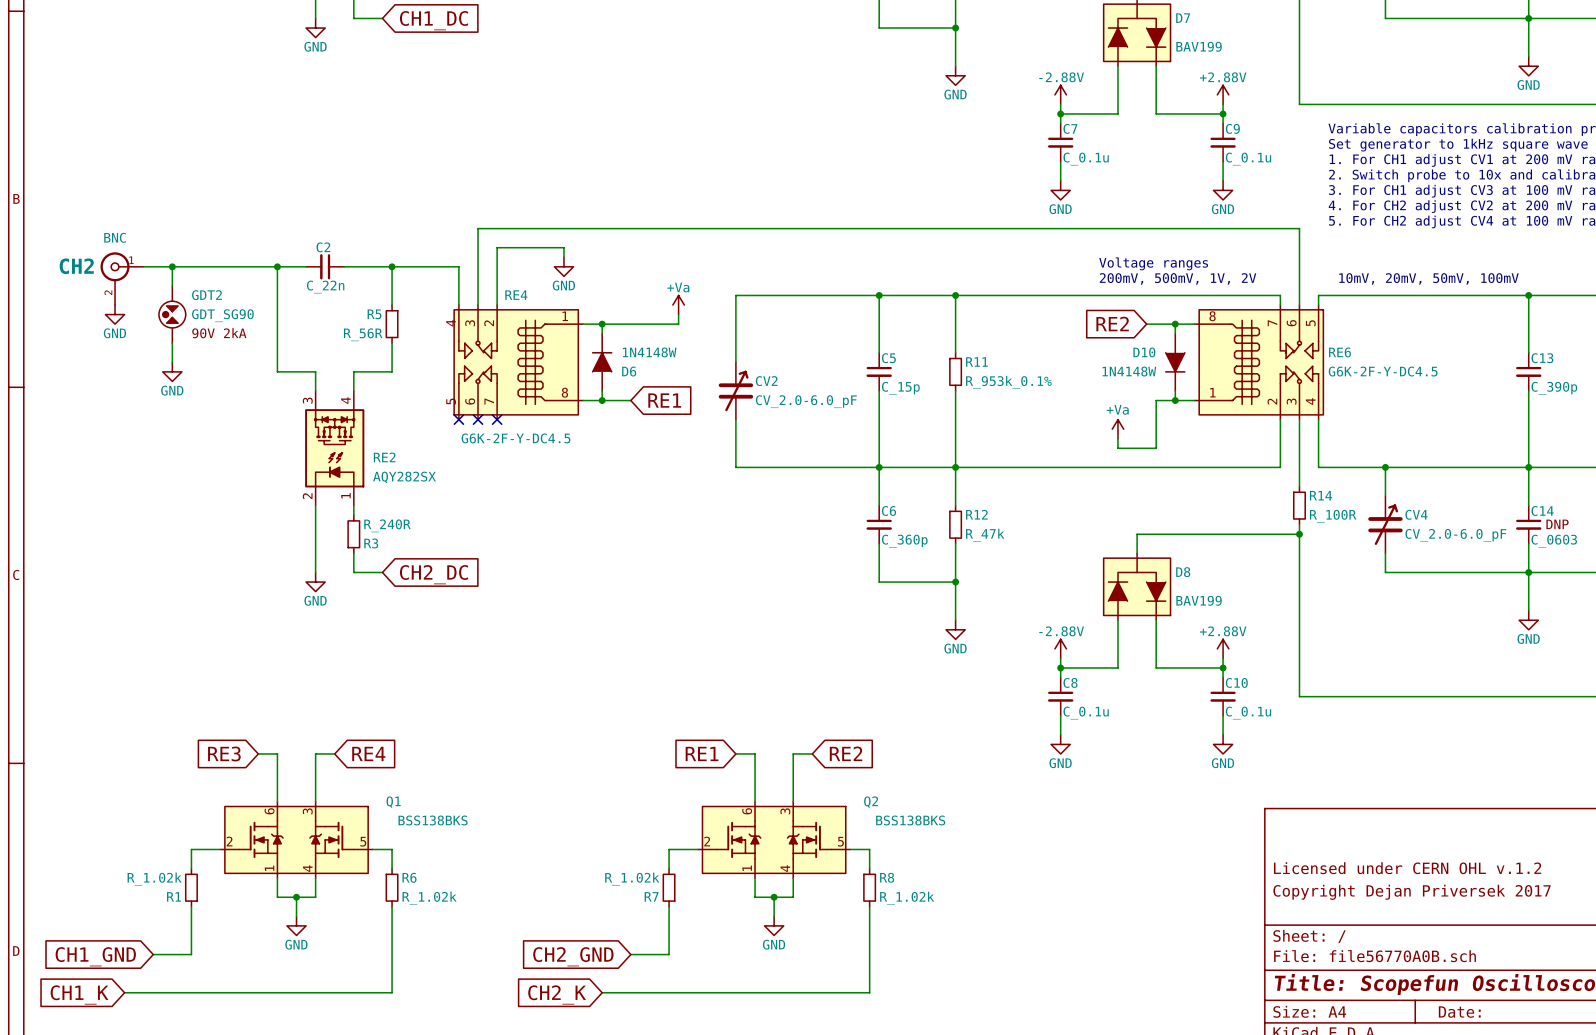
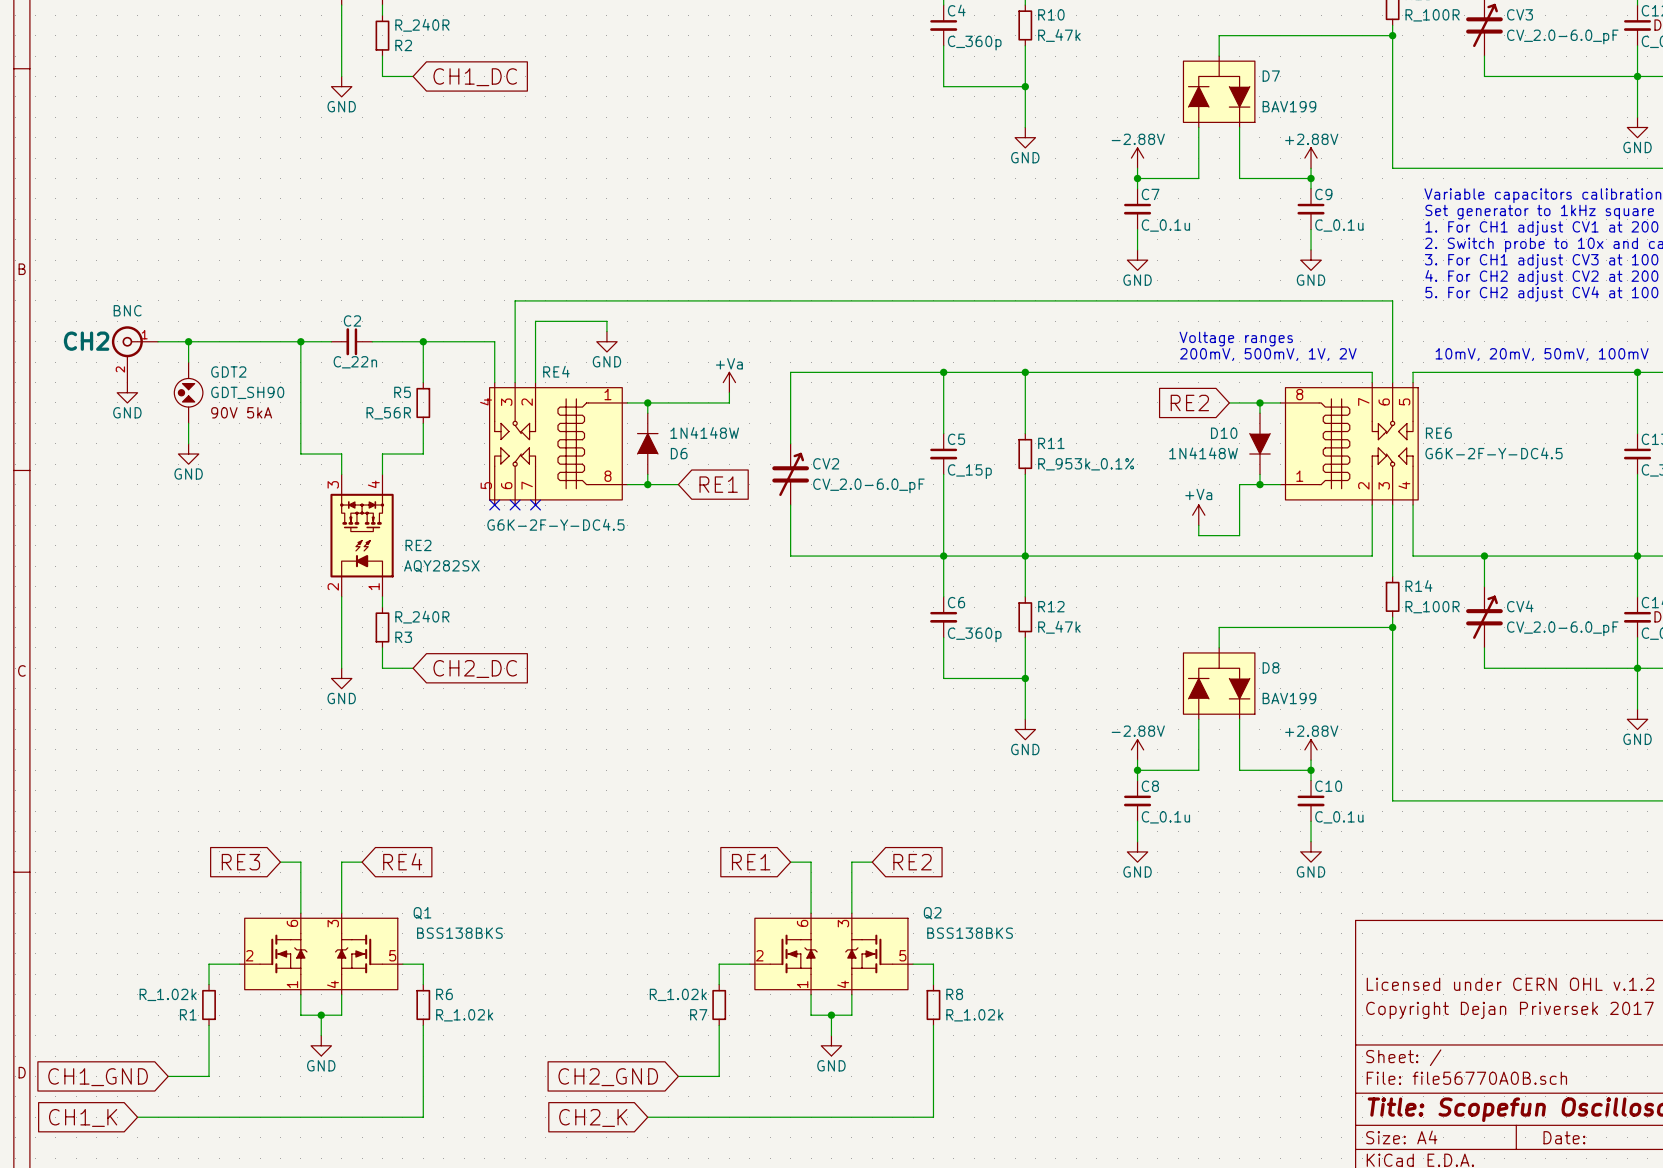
GDT2 value: GDT_SG90 (222, 315) -> GDT_SH90 (247, 392)
GDT2 text: 90V 2kA (219, 333) -> 90V 5kA (241, 412)

